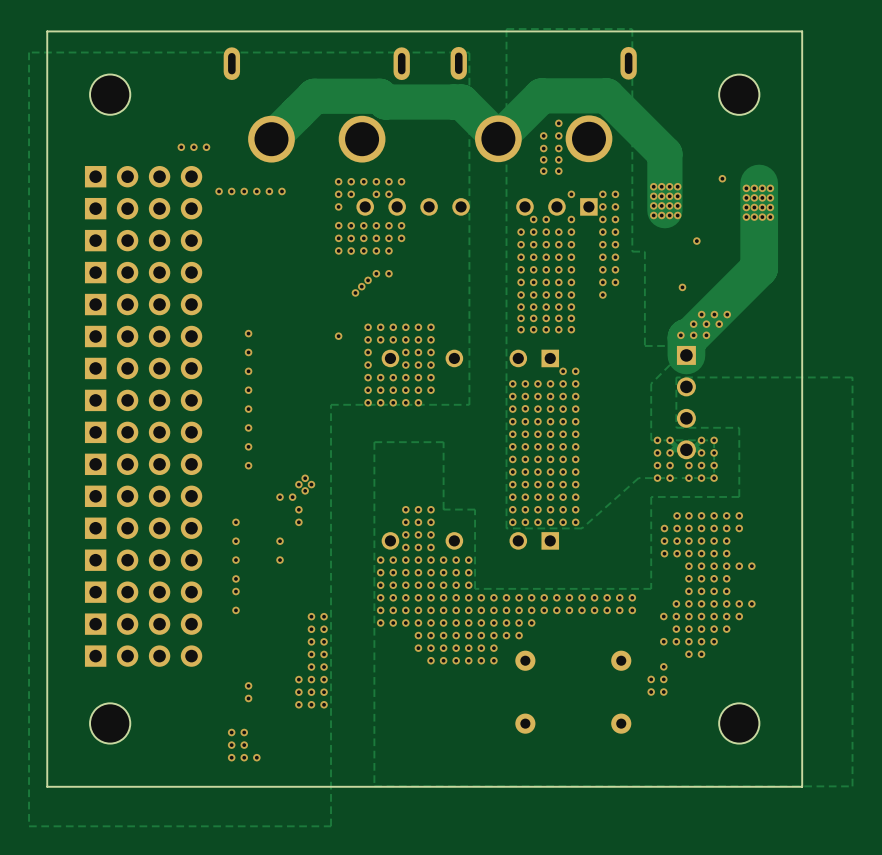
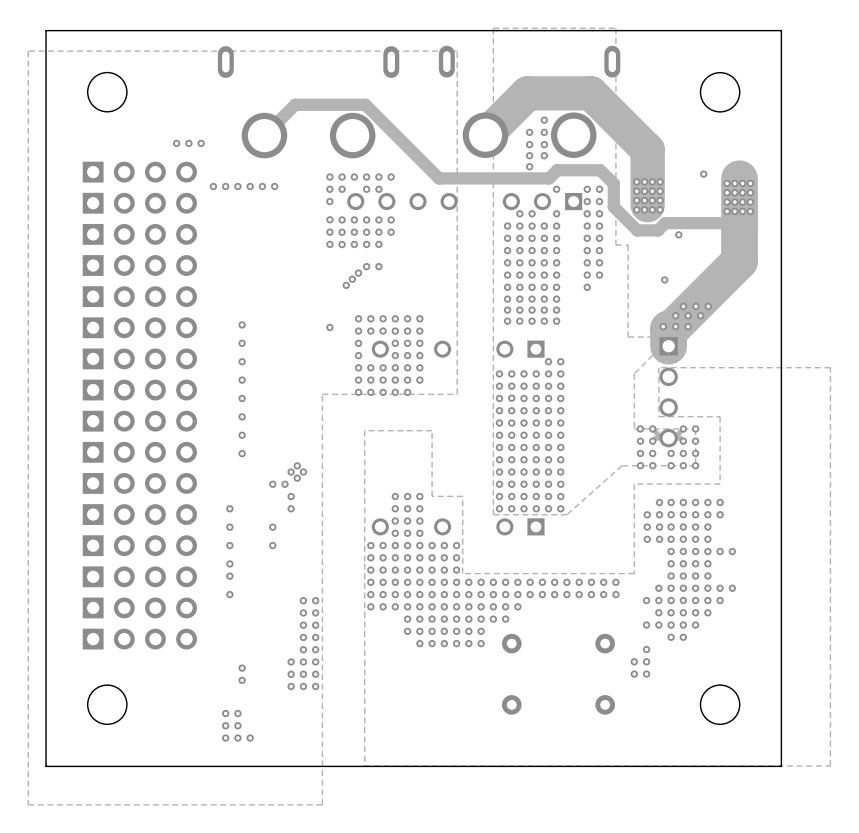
track: (498, 138) (461, 102) (385, 102) (379, 96) (314, 96) (271, 139) -> (739, 224) (665, 223) (658, 230) (637, 230) (613, 206) (613, 183) (600, 170) (557, 170) (549, 178) (439, 178) (365, 104) (295, 104) (264, 135)
via: (558, 171) -> none

